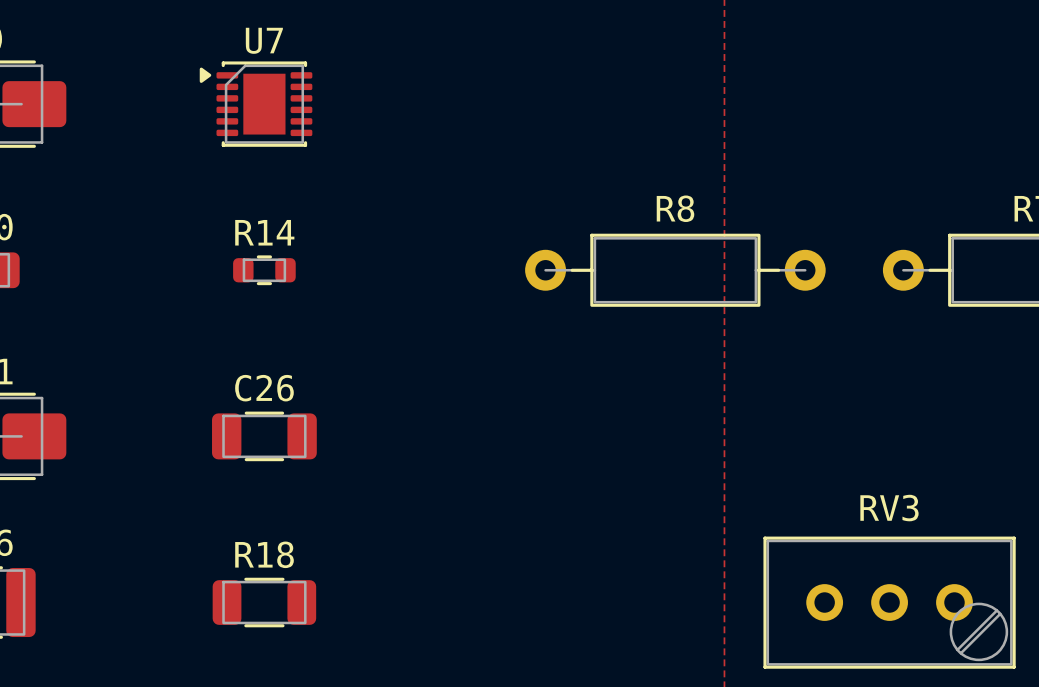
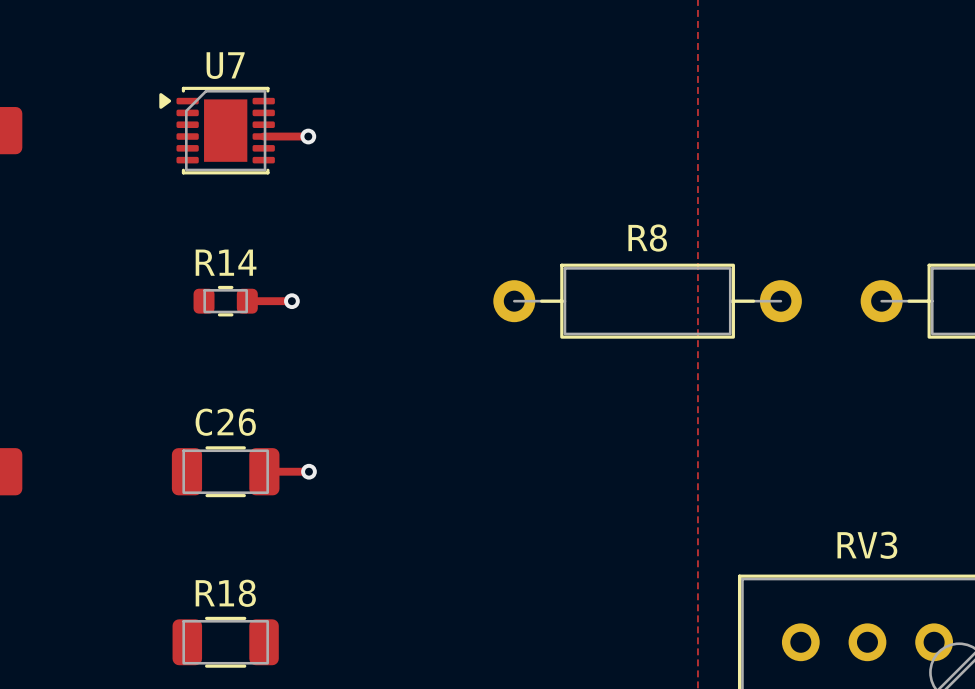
track: none -> (263, 136) (308, 136)
via: none -> (308, 136)
track: none -> (247, 301) (291, 301)
via: none -> (291, 301)
track: none -> (264, 471) (308, 471)
via: none -> (308, 471)

